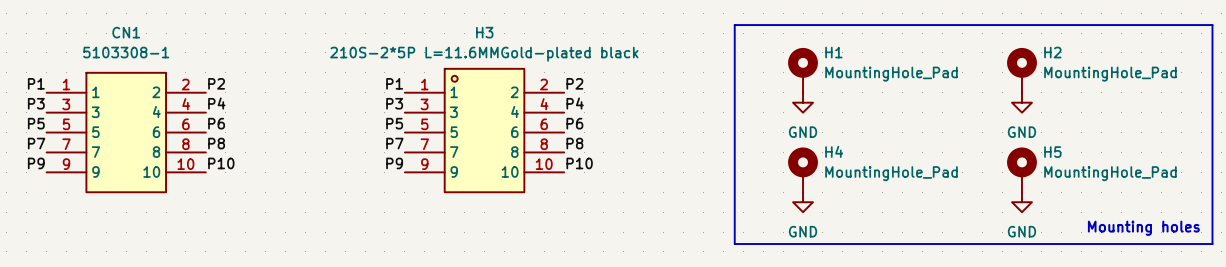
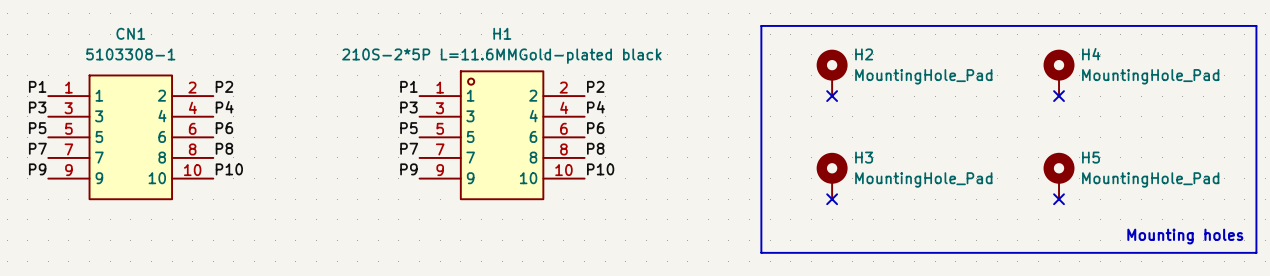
H3 name: H3 (484, 32) -> H1 (502, 33)
H1 name: H1 (833, 52) -> H2 (864, 54)
H2 name: H2 (1052, 52) -> H4 (1091, 54)
no-connect mark: none -> (832, 96)
no-connect mark: none -> (1059, 96)
power symbol: GND (803, 102) -> none
power symbol: GND (1021, 102) -> none
H4 name: H4 (834, 151) -> H3 (864, 157)
no-connect mark: none -> (832, 199)
no-connect mark: none -> (1059, 199)
power symbol: GND (803, 202) -> none
power symbol: GND (1021, 202) -> none

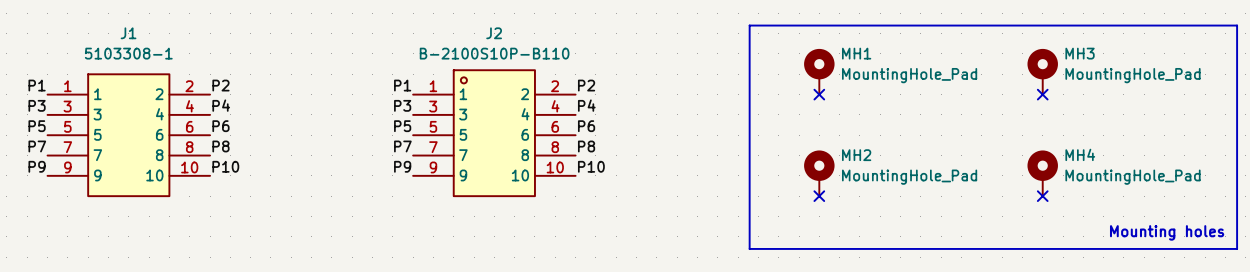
CN1 name: CN1 (130, 33) -> J1 (128, 33)
H1 name: H1 (502, 33) -> J2 (494, 33)
H2 name: H2 (864, 54) -> MH1 (856, 53)
H4 name: H4 (1091, 54) -> MH3 (1080, 53)
H1 value: 210S-2*5P L=11.6MMGold-plated black (501, 56) -> B-2100S10P-B110 (494, 53)
H3 name: H3 (864, 157) -> MH2 (856, 155)
H5 name: H5 (1091, 157) -> MH4 (1080, 154)

